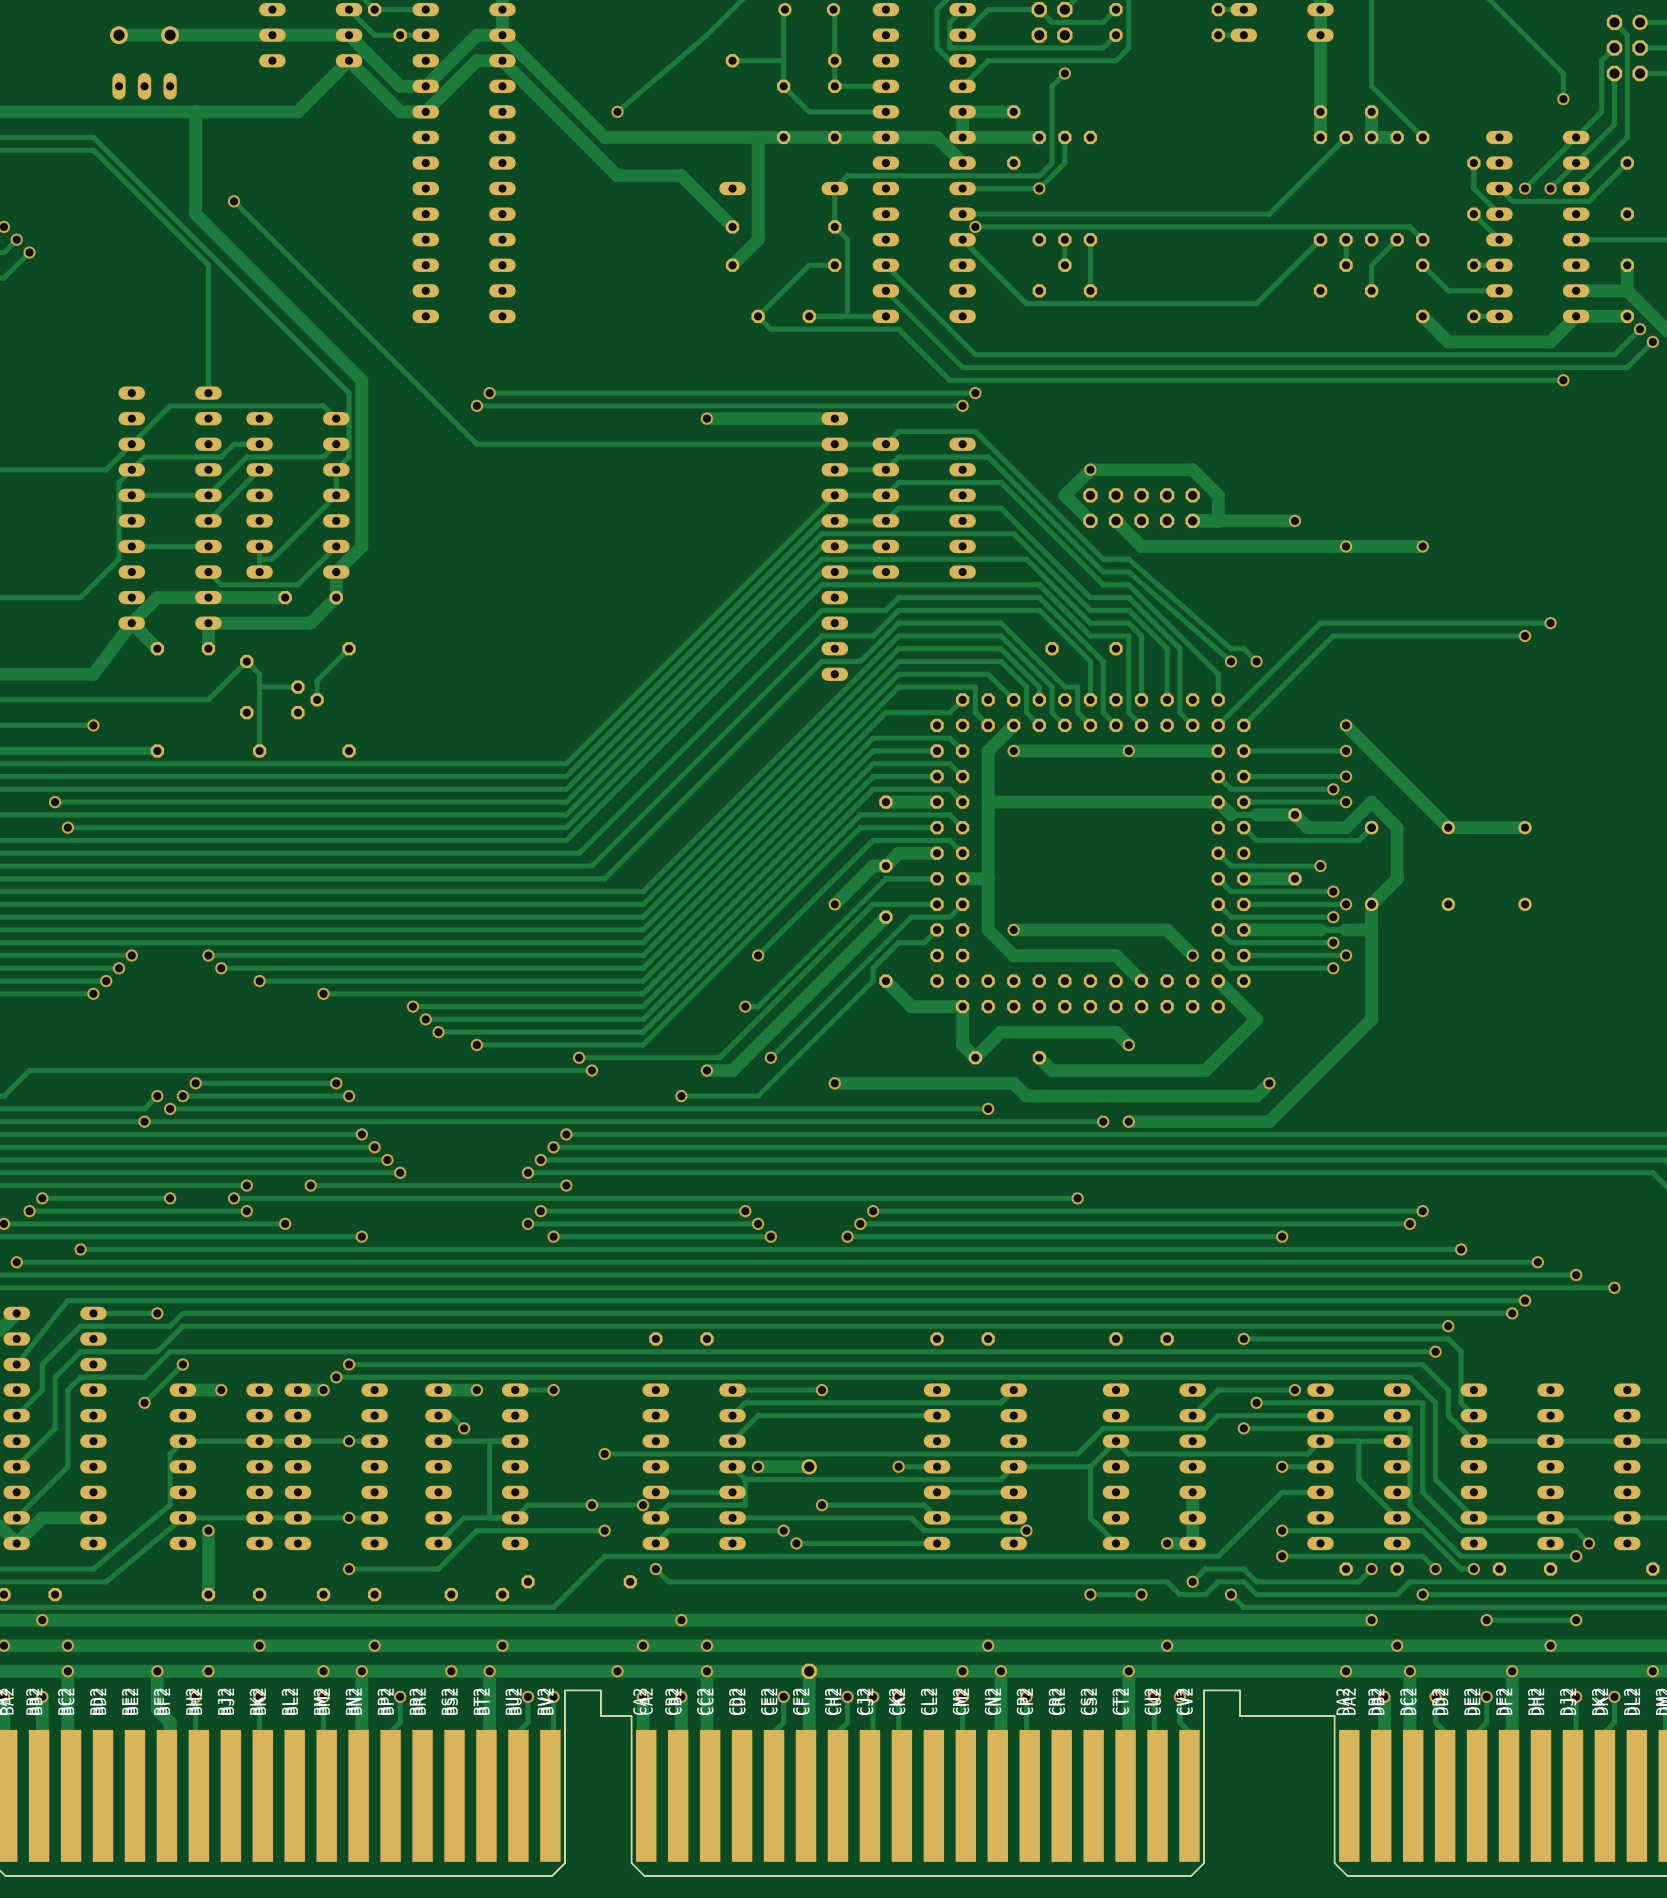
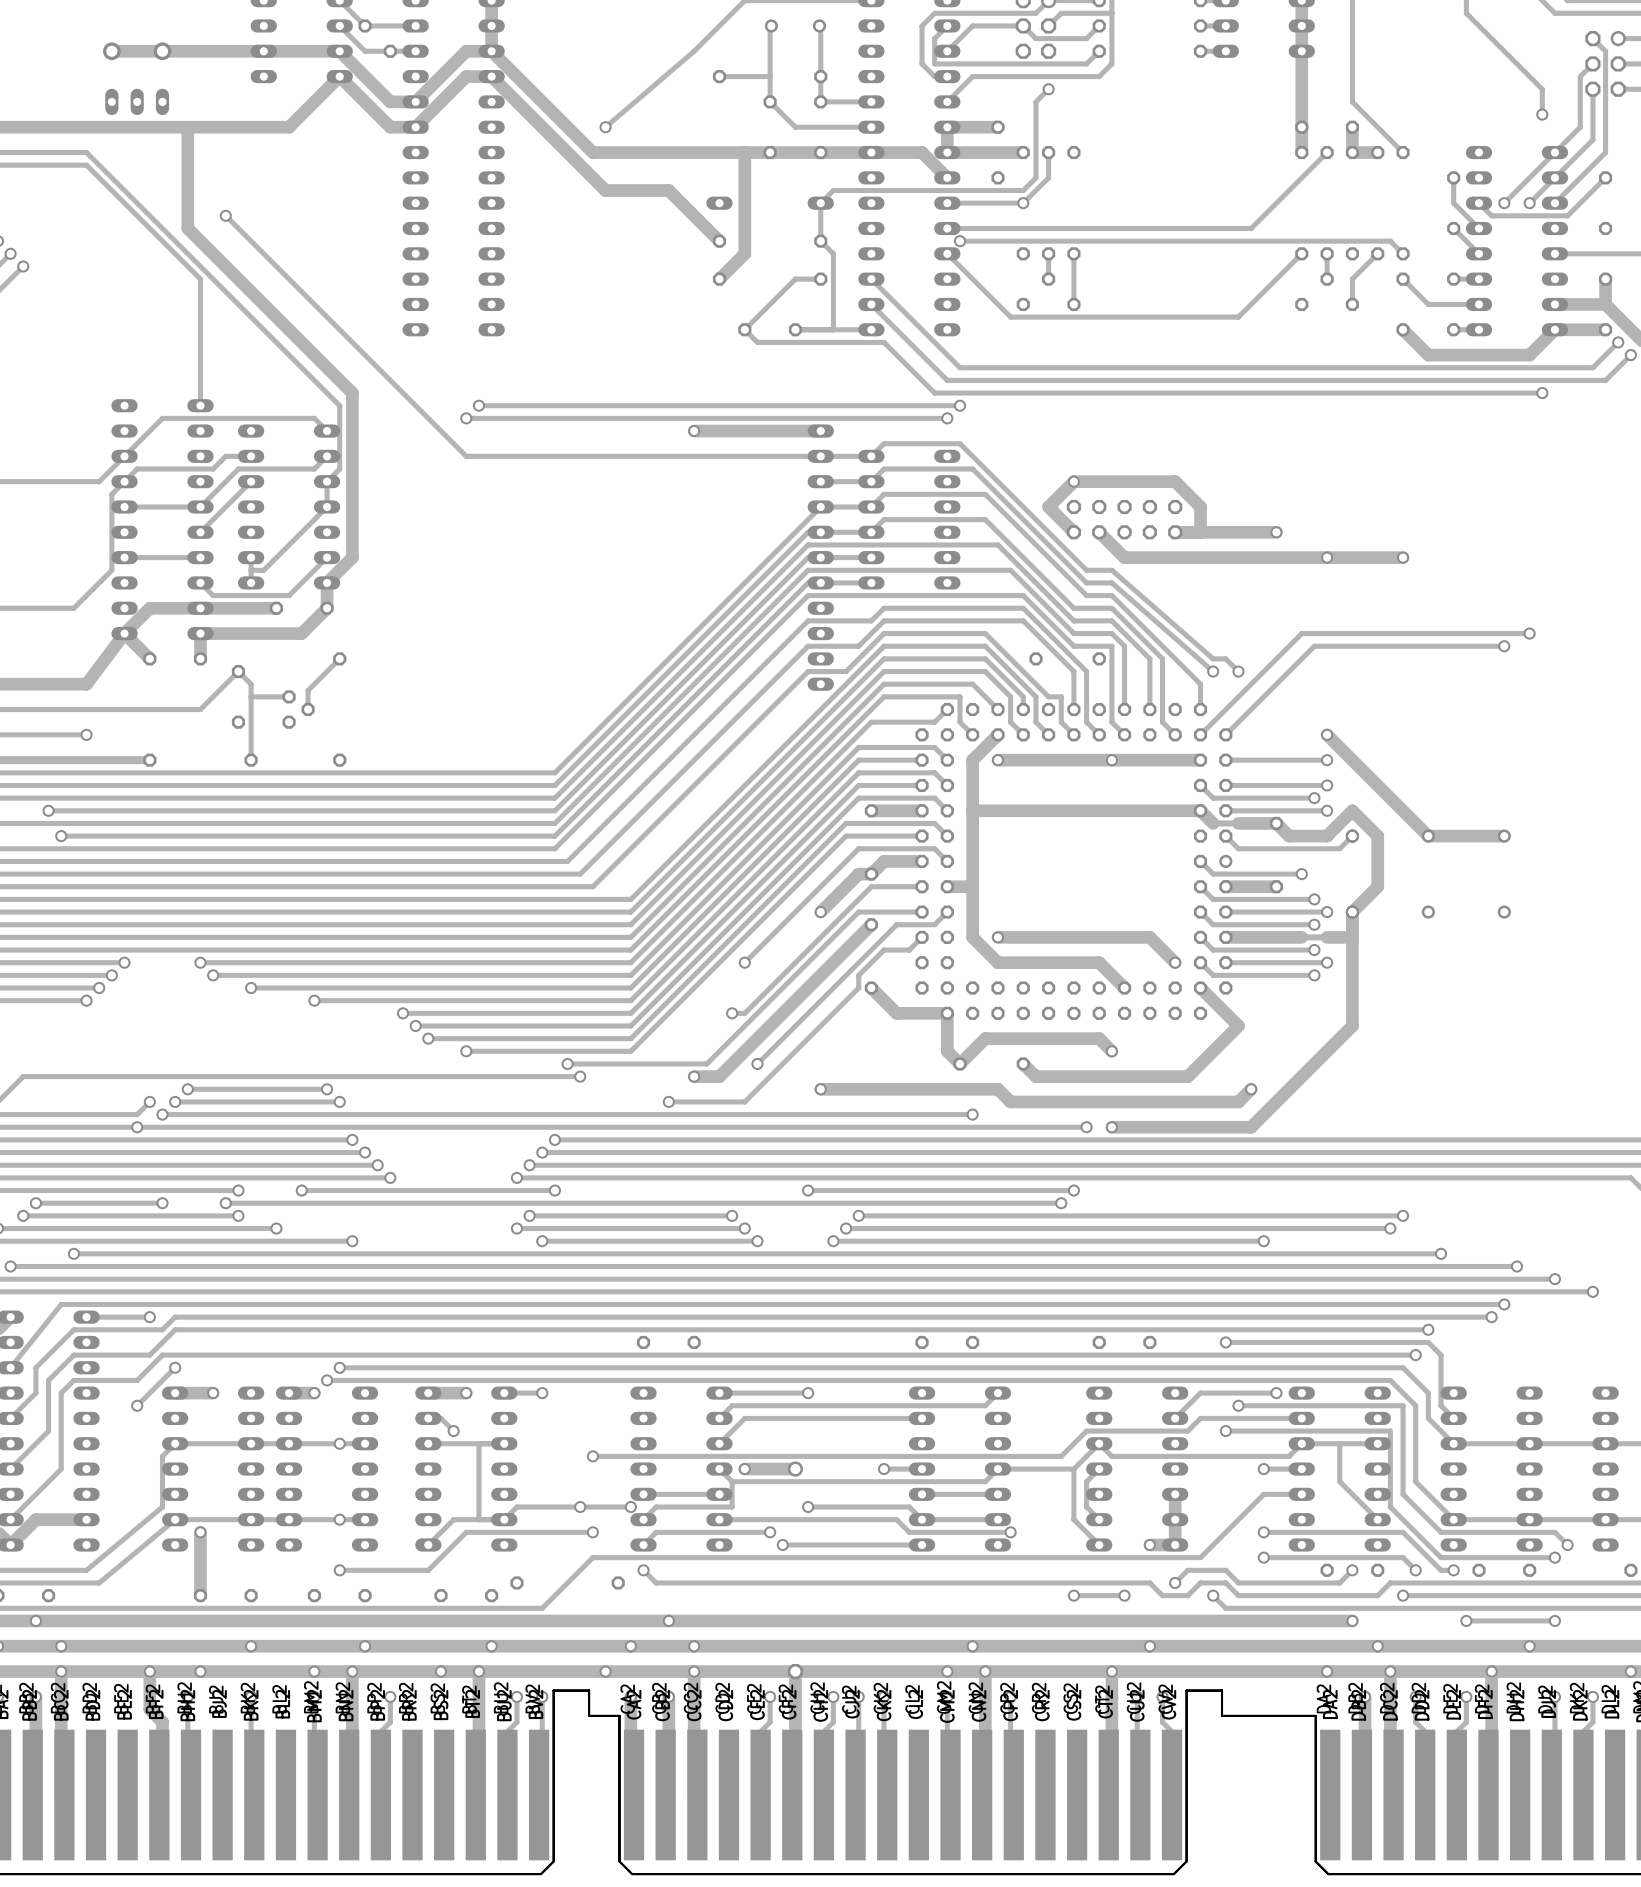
via: none -> (808, 1190)
track: none -> (1073, 1190) (808, 1190)
via: none -> (1073, 1190)
track: none -> (1099, 1469) (1086, 1481) (1086, 1507) (1099, 1519)

